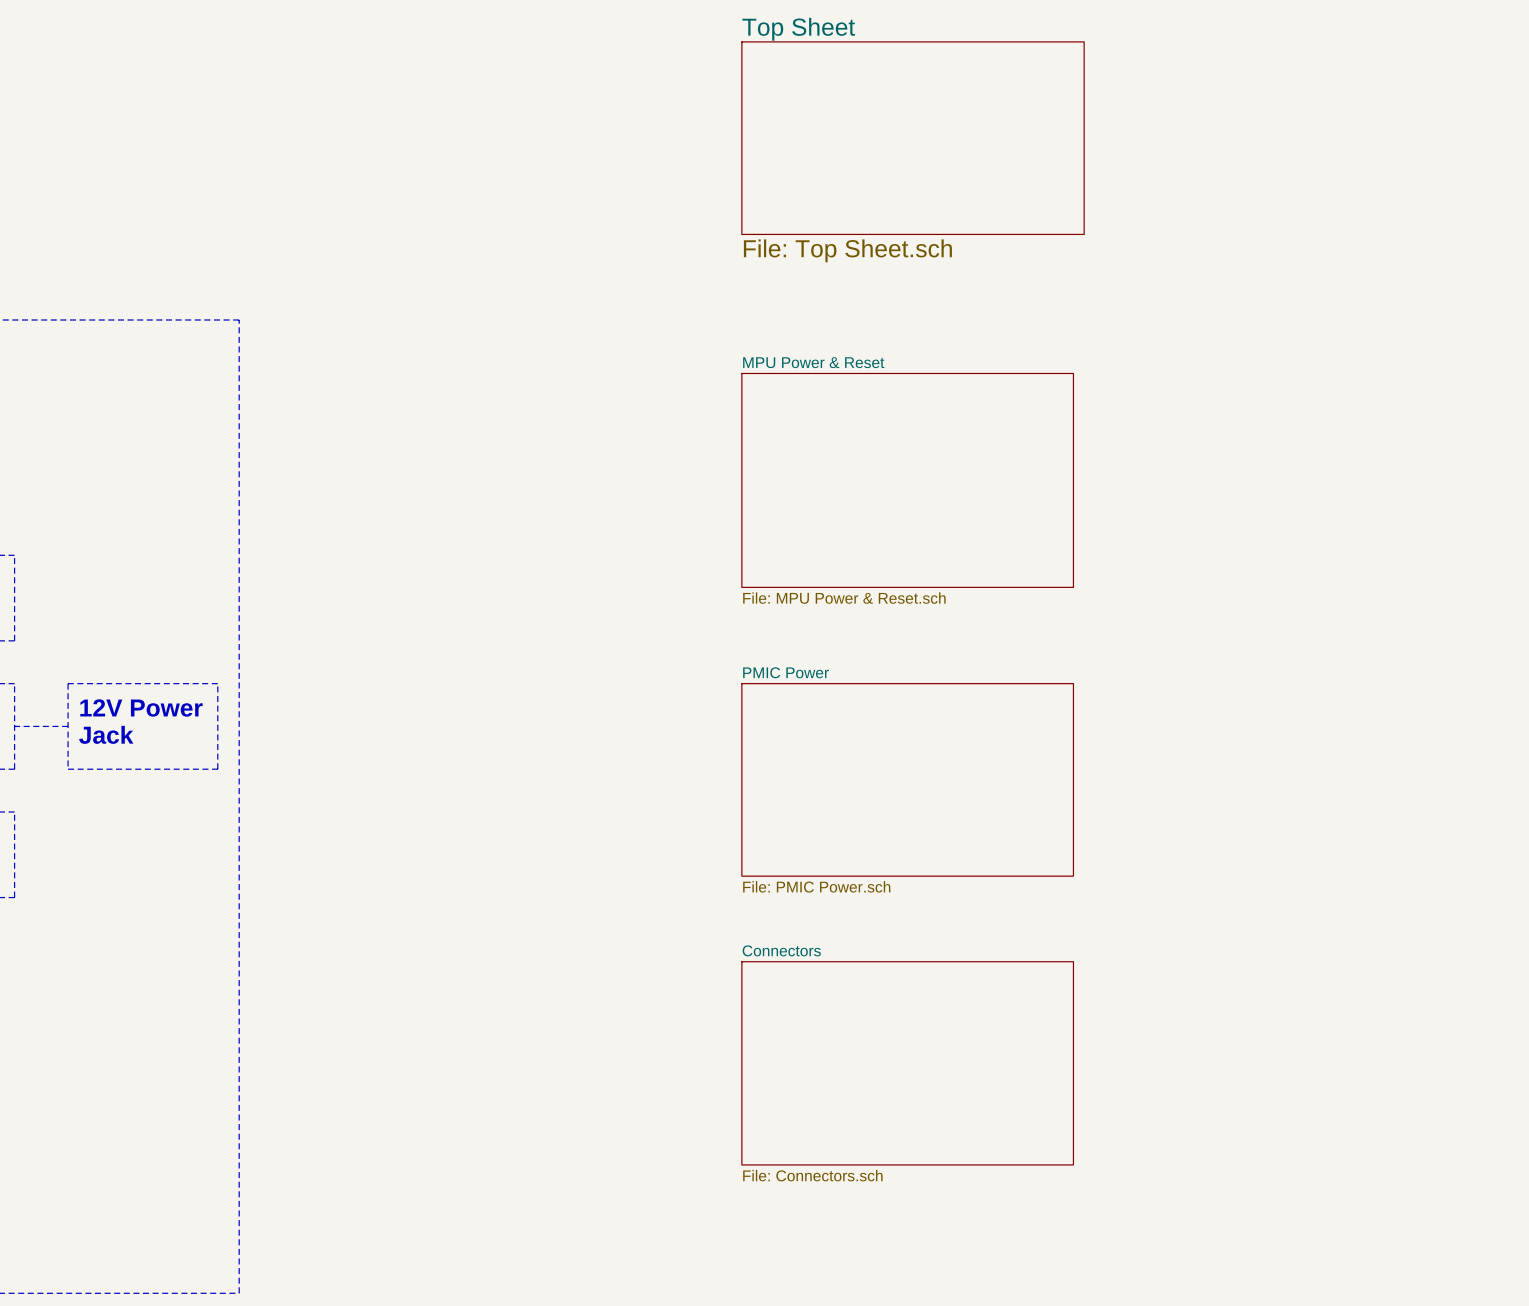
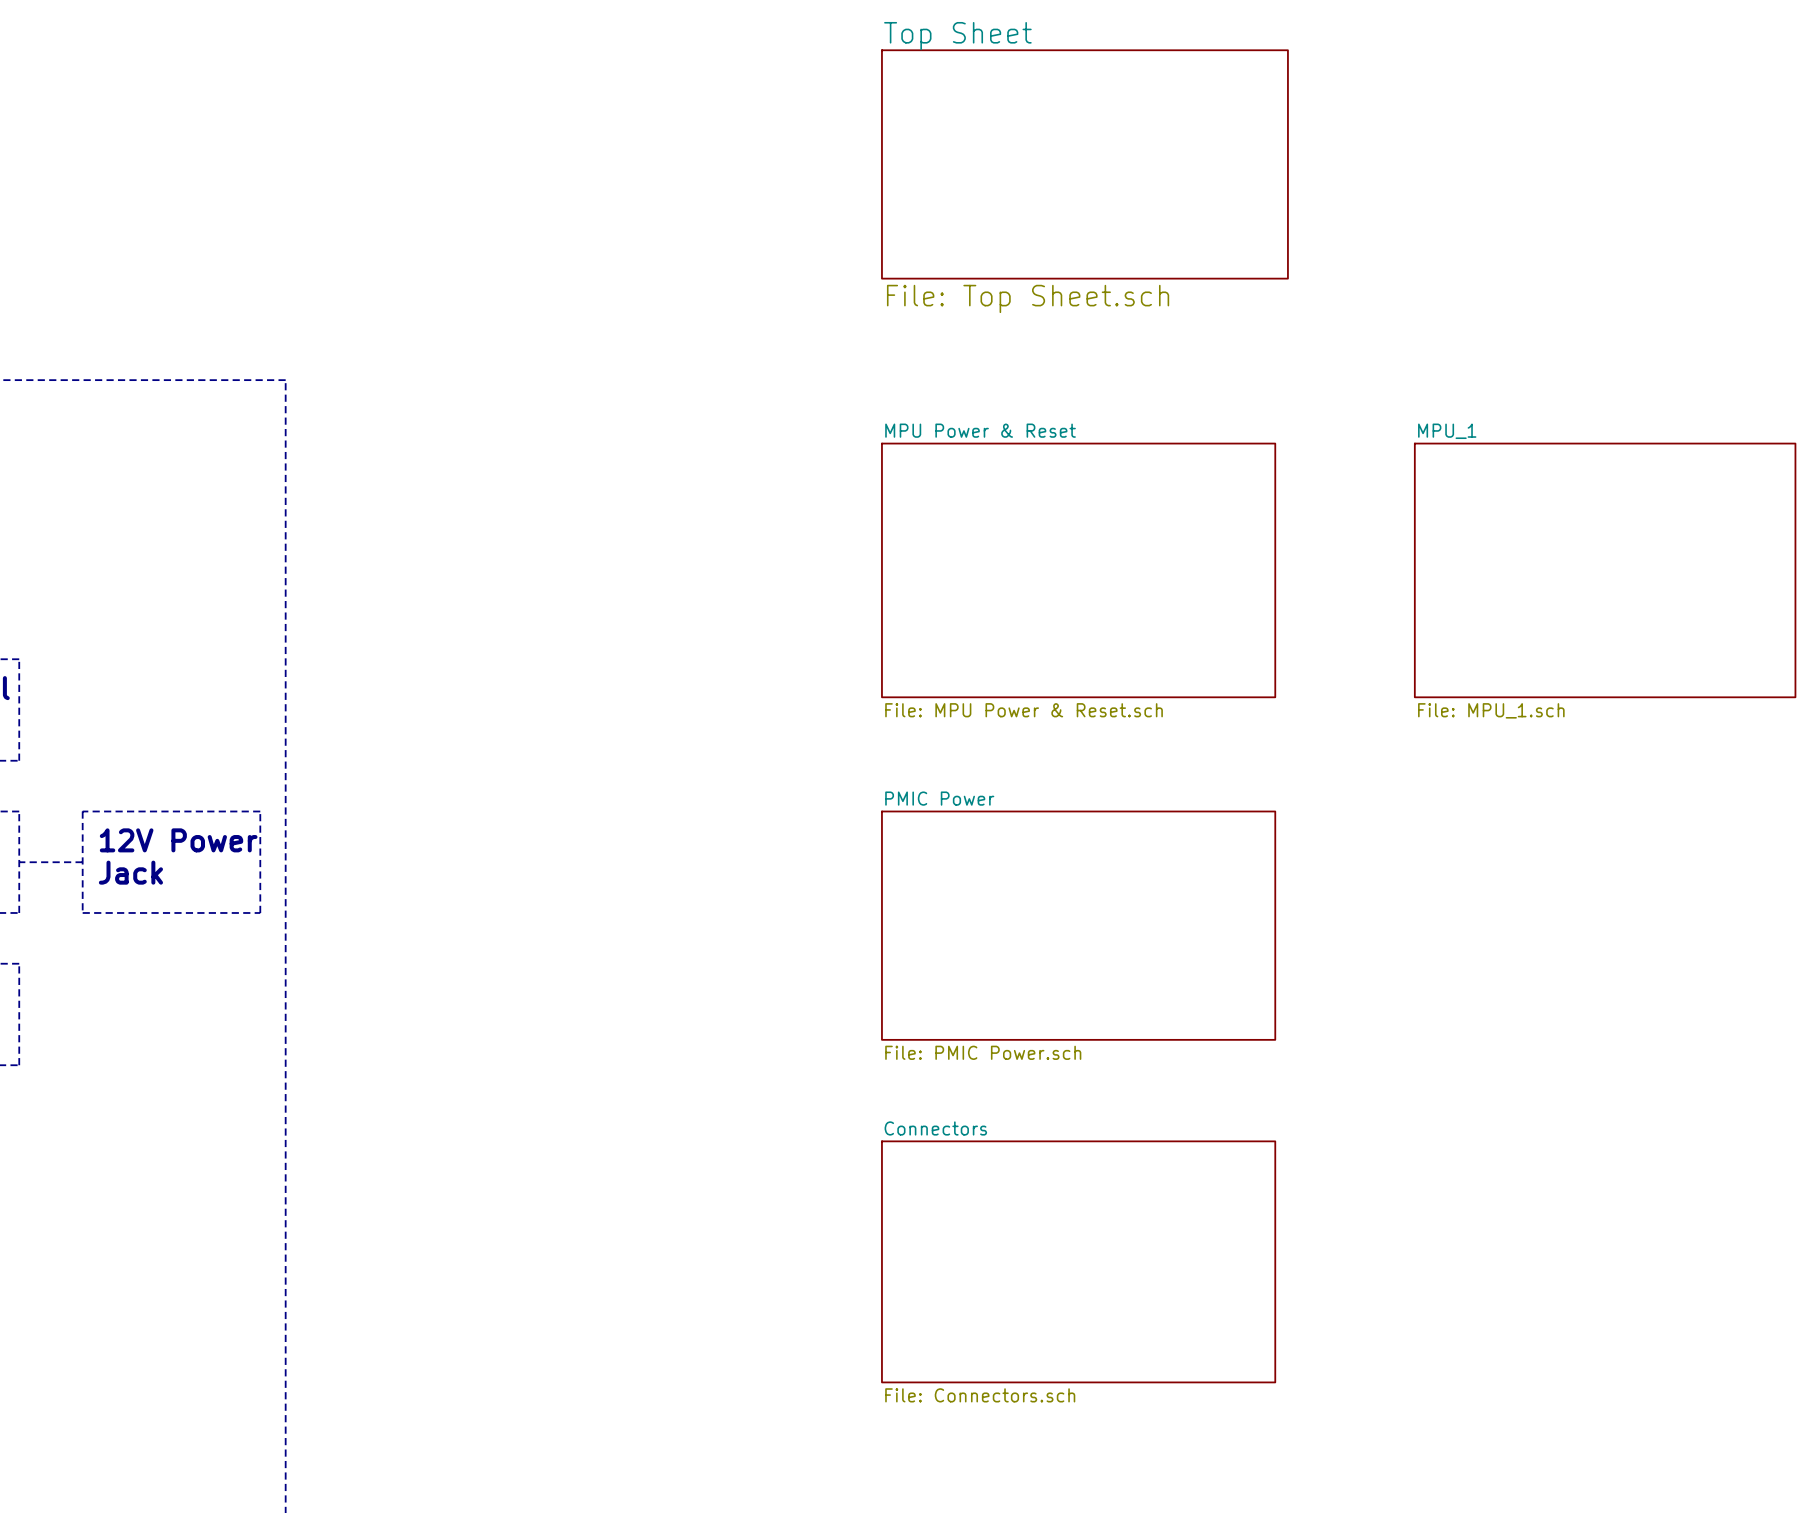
sheet MPU_1: none -> File: MPU_1.sch (1605, 570)

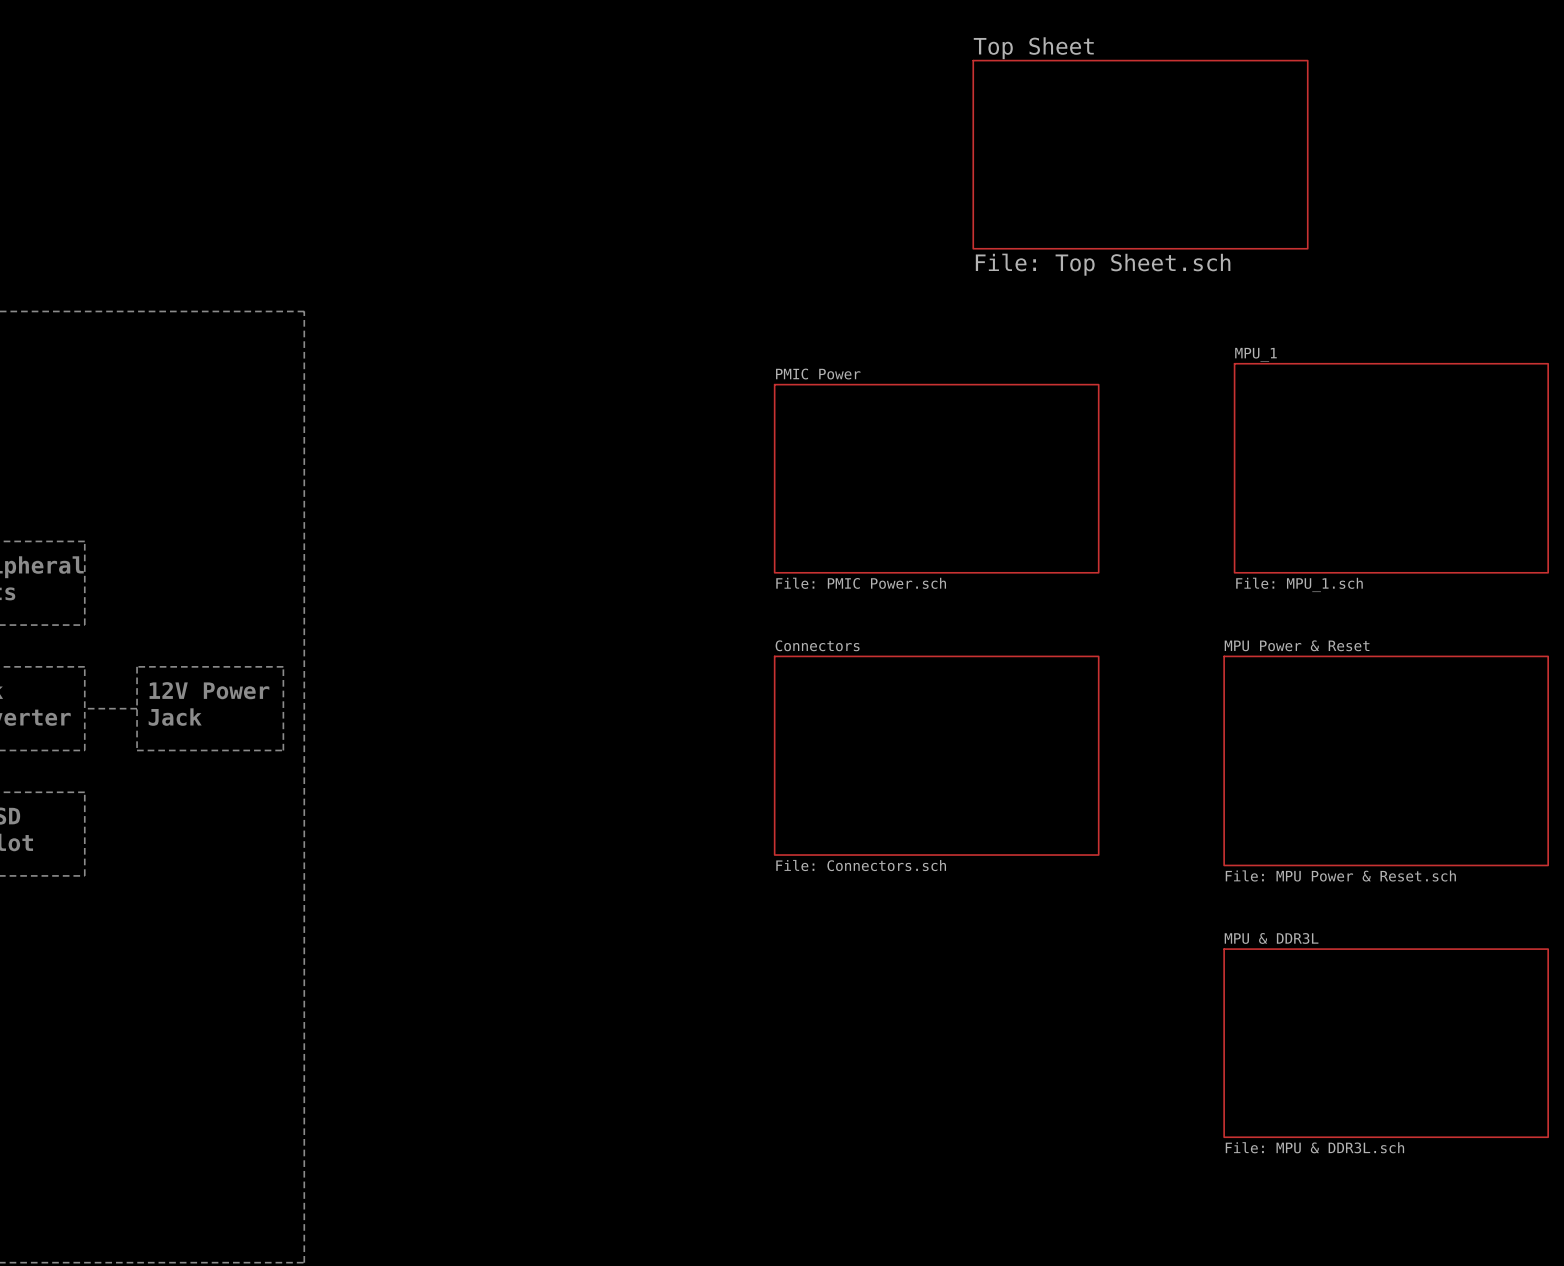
sheet Top Sheet position: (1084, 164) -> (1140, 154)
sheet MPU Power & Reset: File: MPU Power & Reset.sch (1078, 570) -> none
sheet PMIC Power: none -> File: PMIC Power.sch (936, 478)
sheet Connectors: none -> File: Connectors.sch (936, 755)
sheet PMIC Power: File: PMIC Power.sch (1078, 925) -> none
sheet MPU Power & Reset: none -> File: MPU Power & Reset.sch (1386, 760)
sheet Connectors: File: Connectors.sch (1078, 1261) -> none
sheet MPU & DDR3L: none -> File: MPU & DDR3L.sch (1386, 1043)

